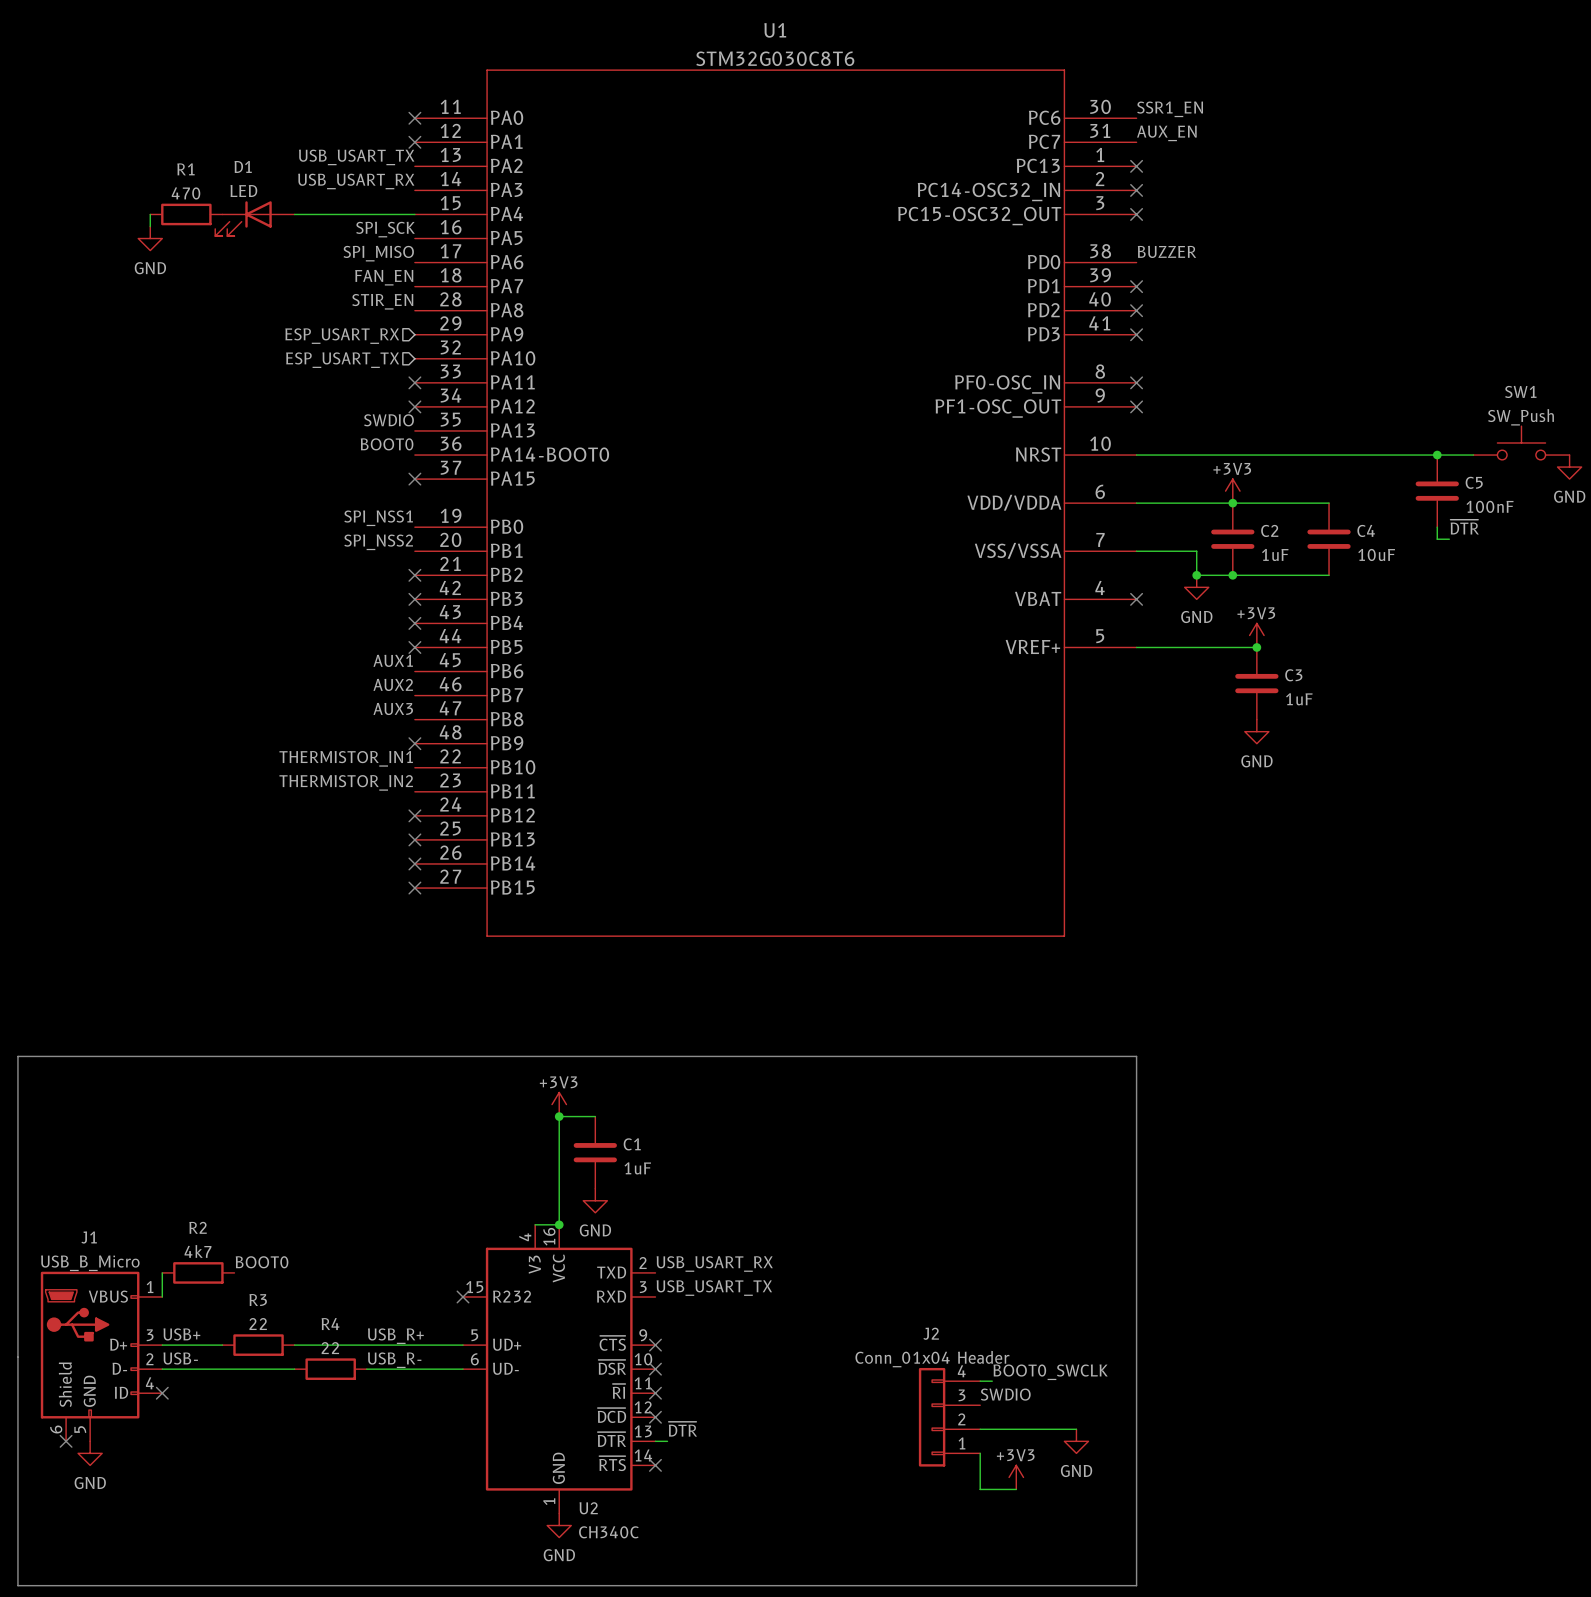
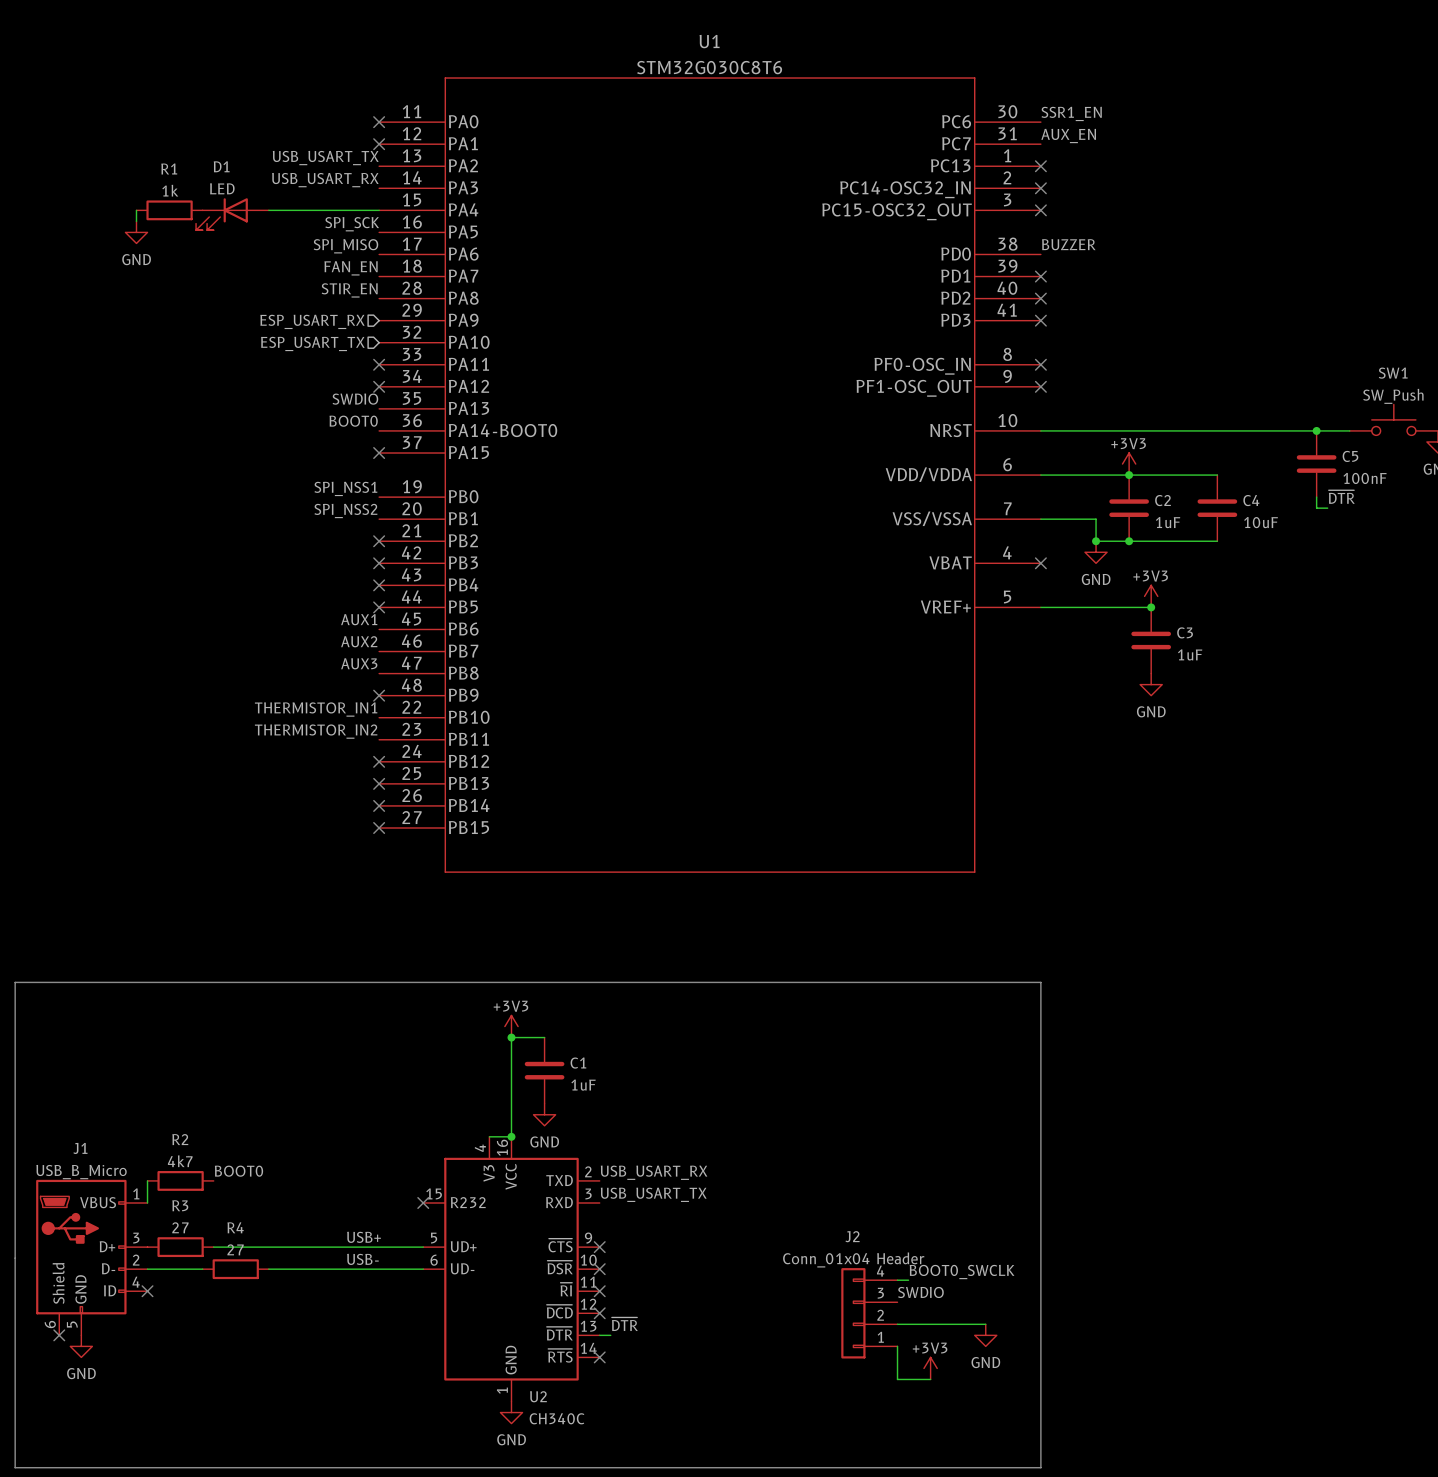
R1 value: 470 (186, 193) -> 1k (170, 190)
R3 value: 22 (258, 1324) -> 27 (180, 1227)
label position: USB+ (181, 1334) -> USB+ (364, 1237)
label: USB_R+ (395, 1336) -> none
wire: (162, 1345) (222, 1345) -> (213, 1247) (268, 1247)
R3 position: (258, 1345) -> (180, 1247)
R4 value: 22 (330, 1348) -> 27 (235, 1249)
label position: USB- (180, 1358) -> USB- (362, 1259)
label: USB_R- (394, 1360) -> none
wire: (222, 1369) (294, 1369) -> (335, 1269) (268, 1269)
R4 position: (330, 1369) -> (235, 1269)

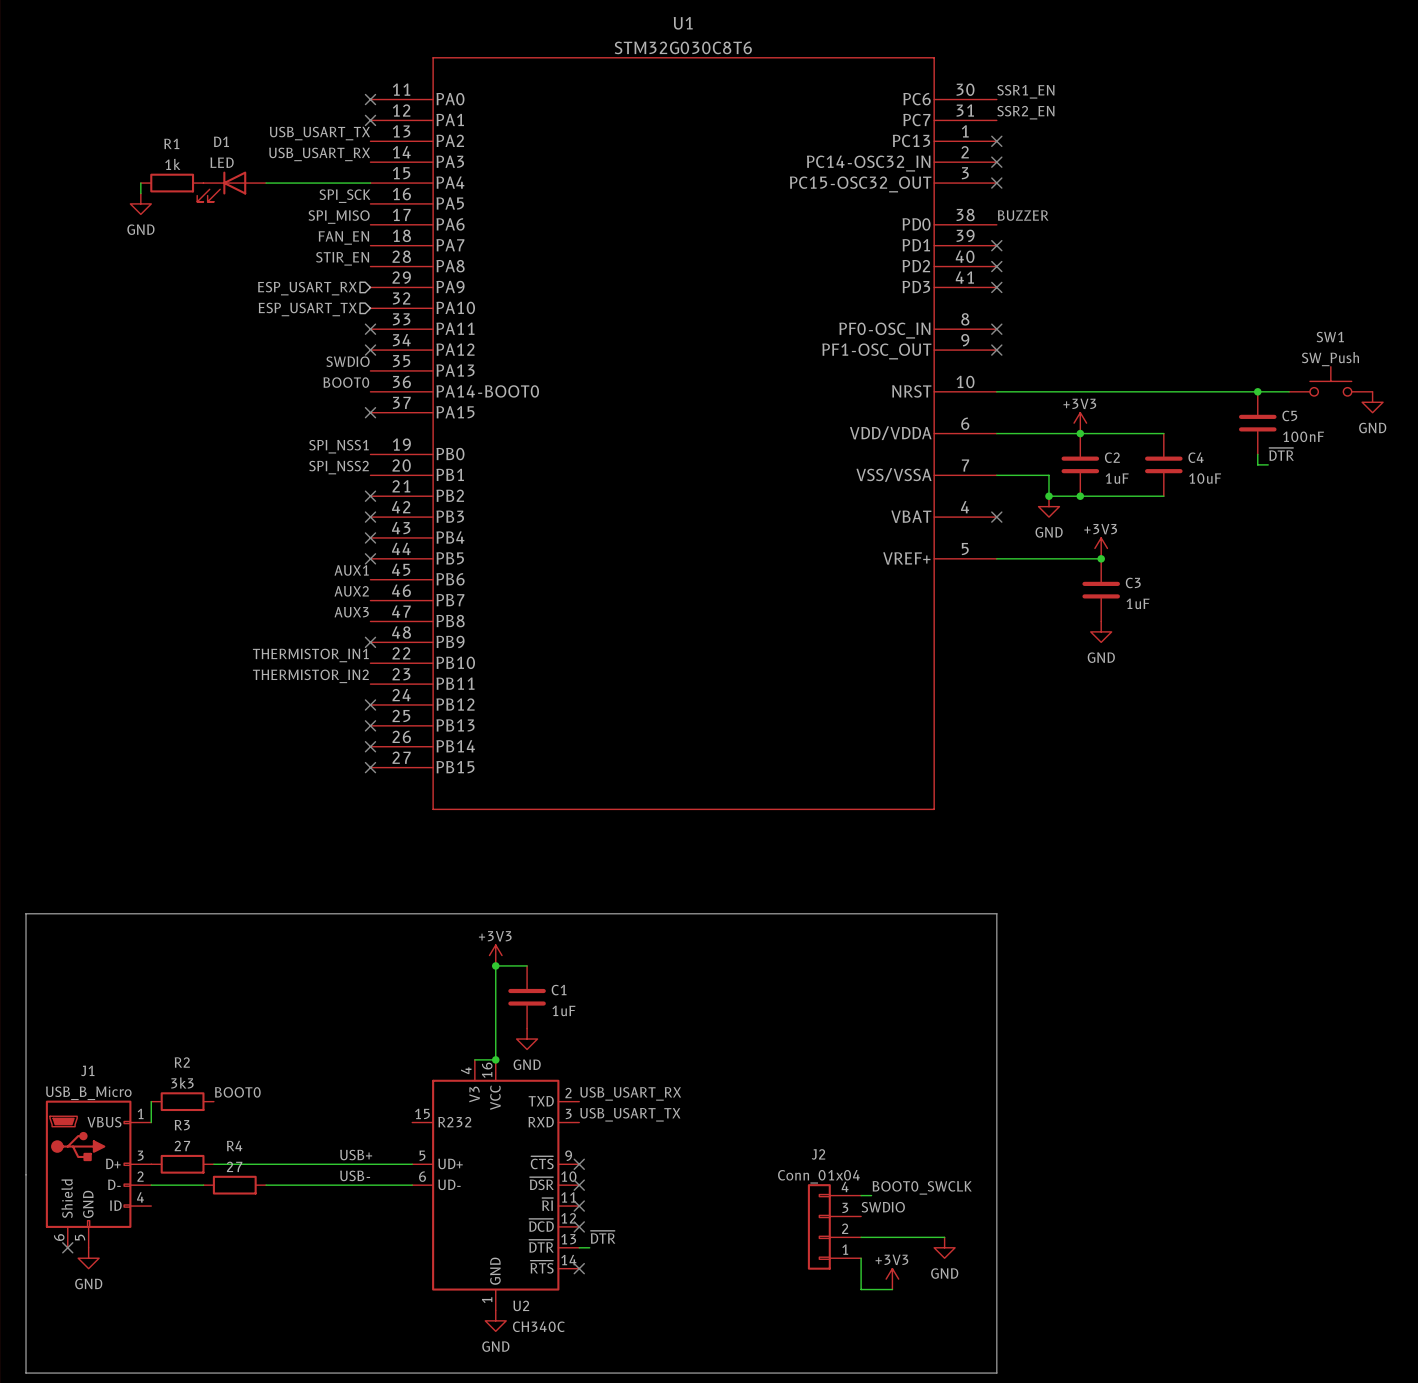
label: AUX_EN (1068, 135) -> SSR2_EN (1025, 112)
R2 value: 4k7 (180, 1161) -> 3k3 (182, 1083)
no-connect mark: (423, 1203) -> none
J2 value: Conn_01x04 Header (853, 1259) -> Conn_01x04 (818, 1176)
no-connect mark: (147, 1291) -> none

